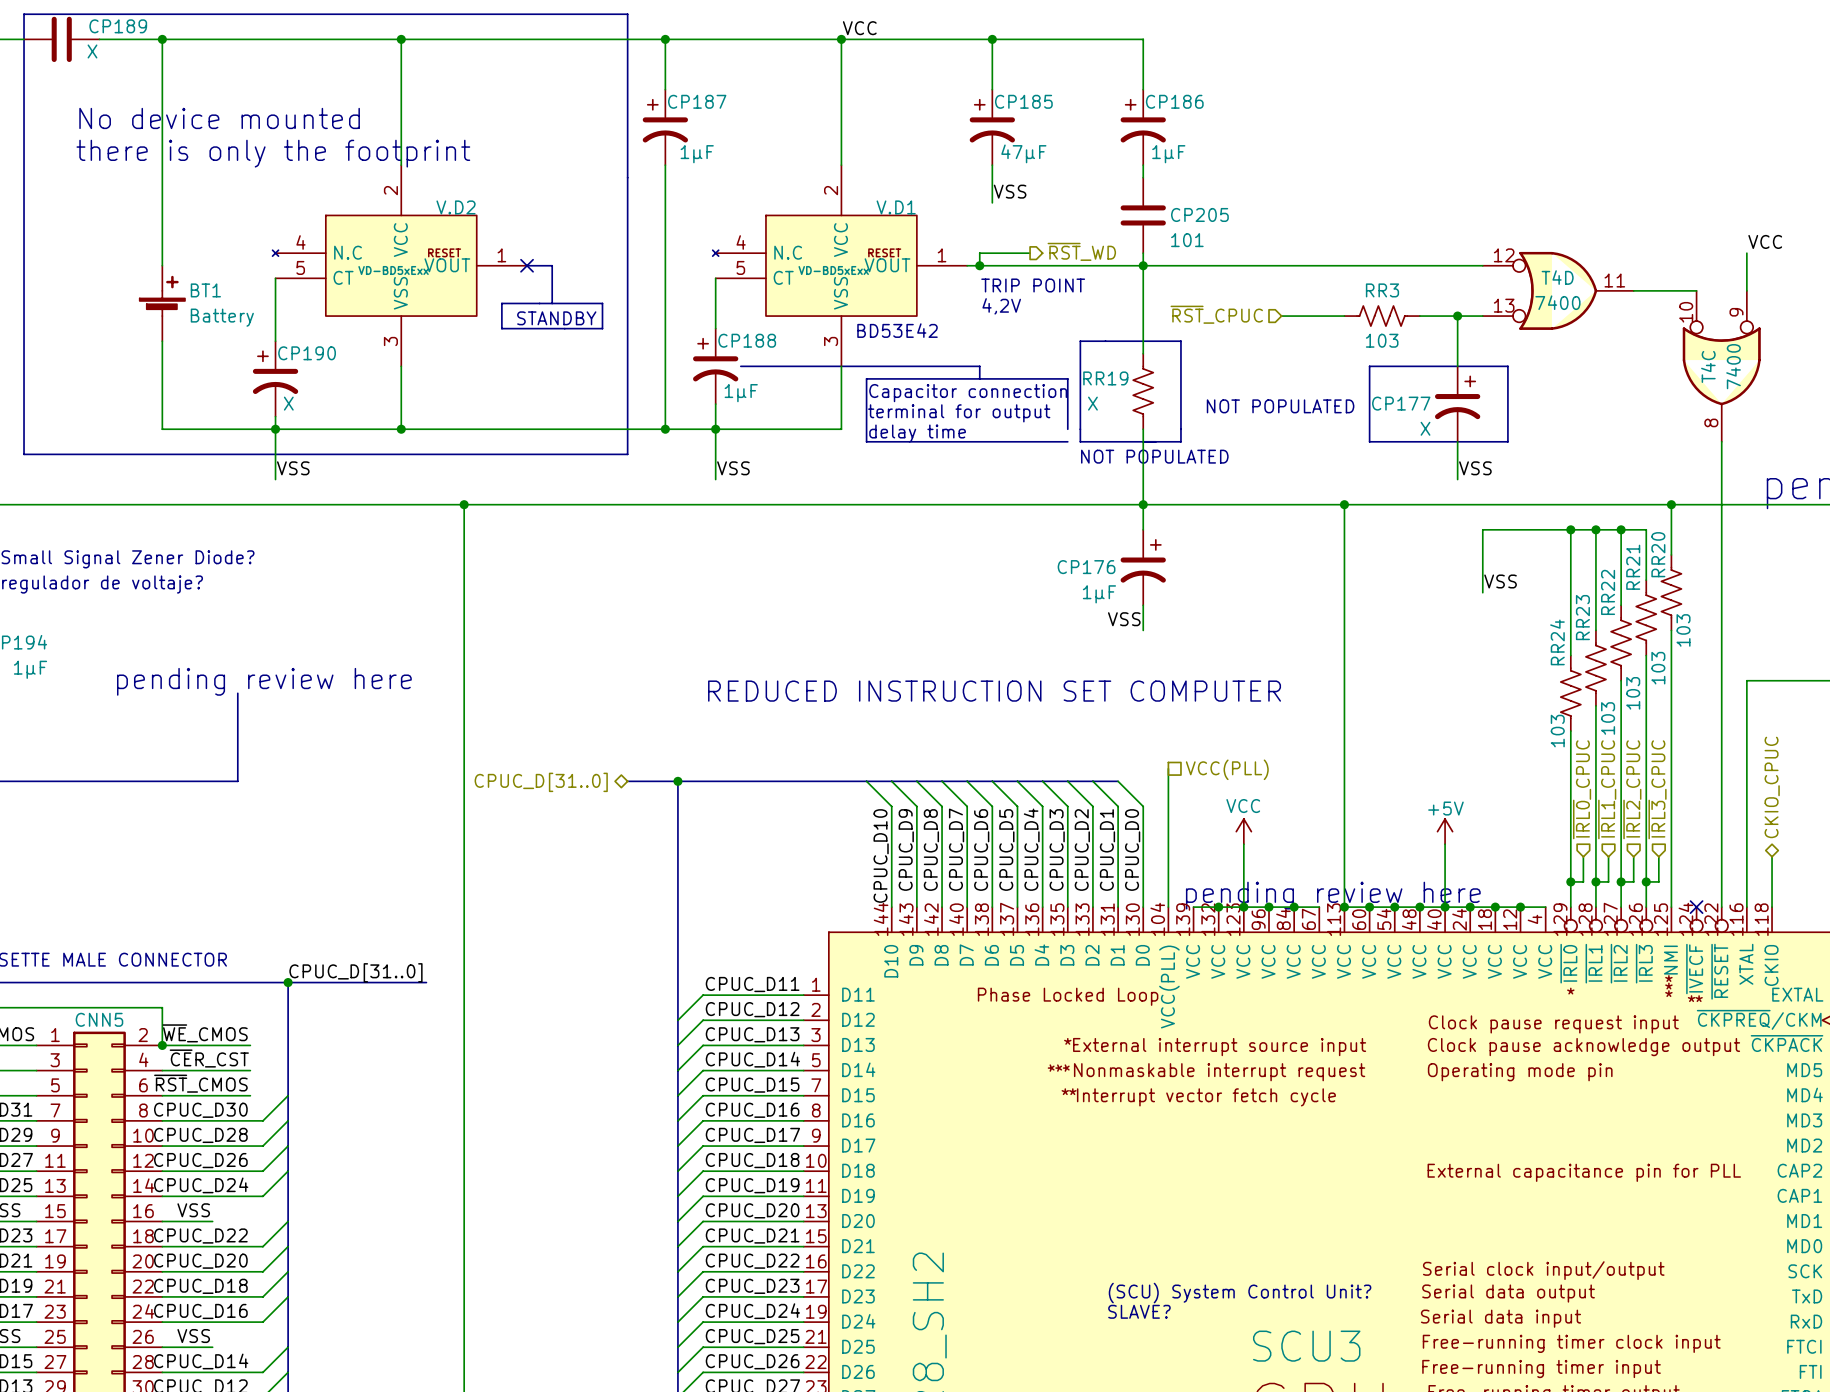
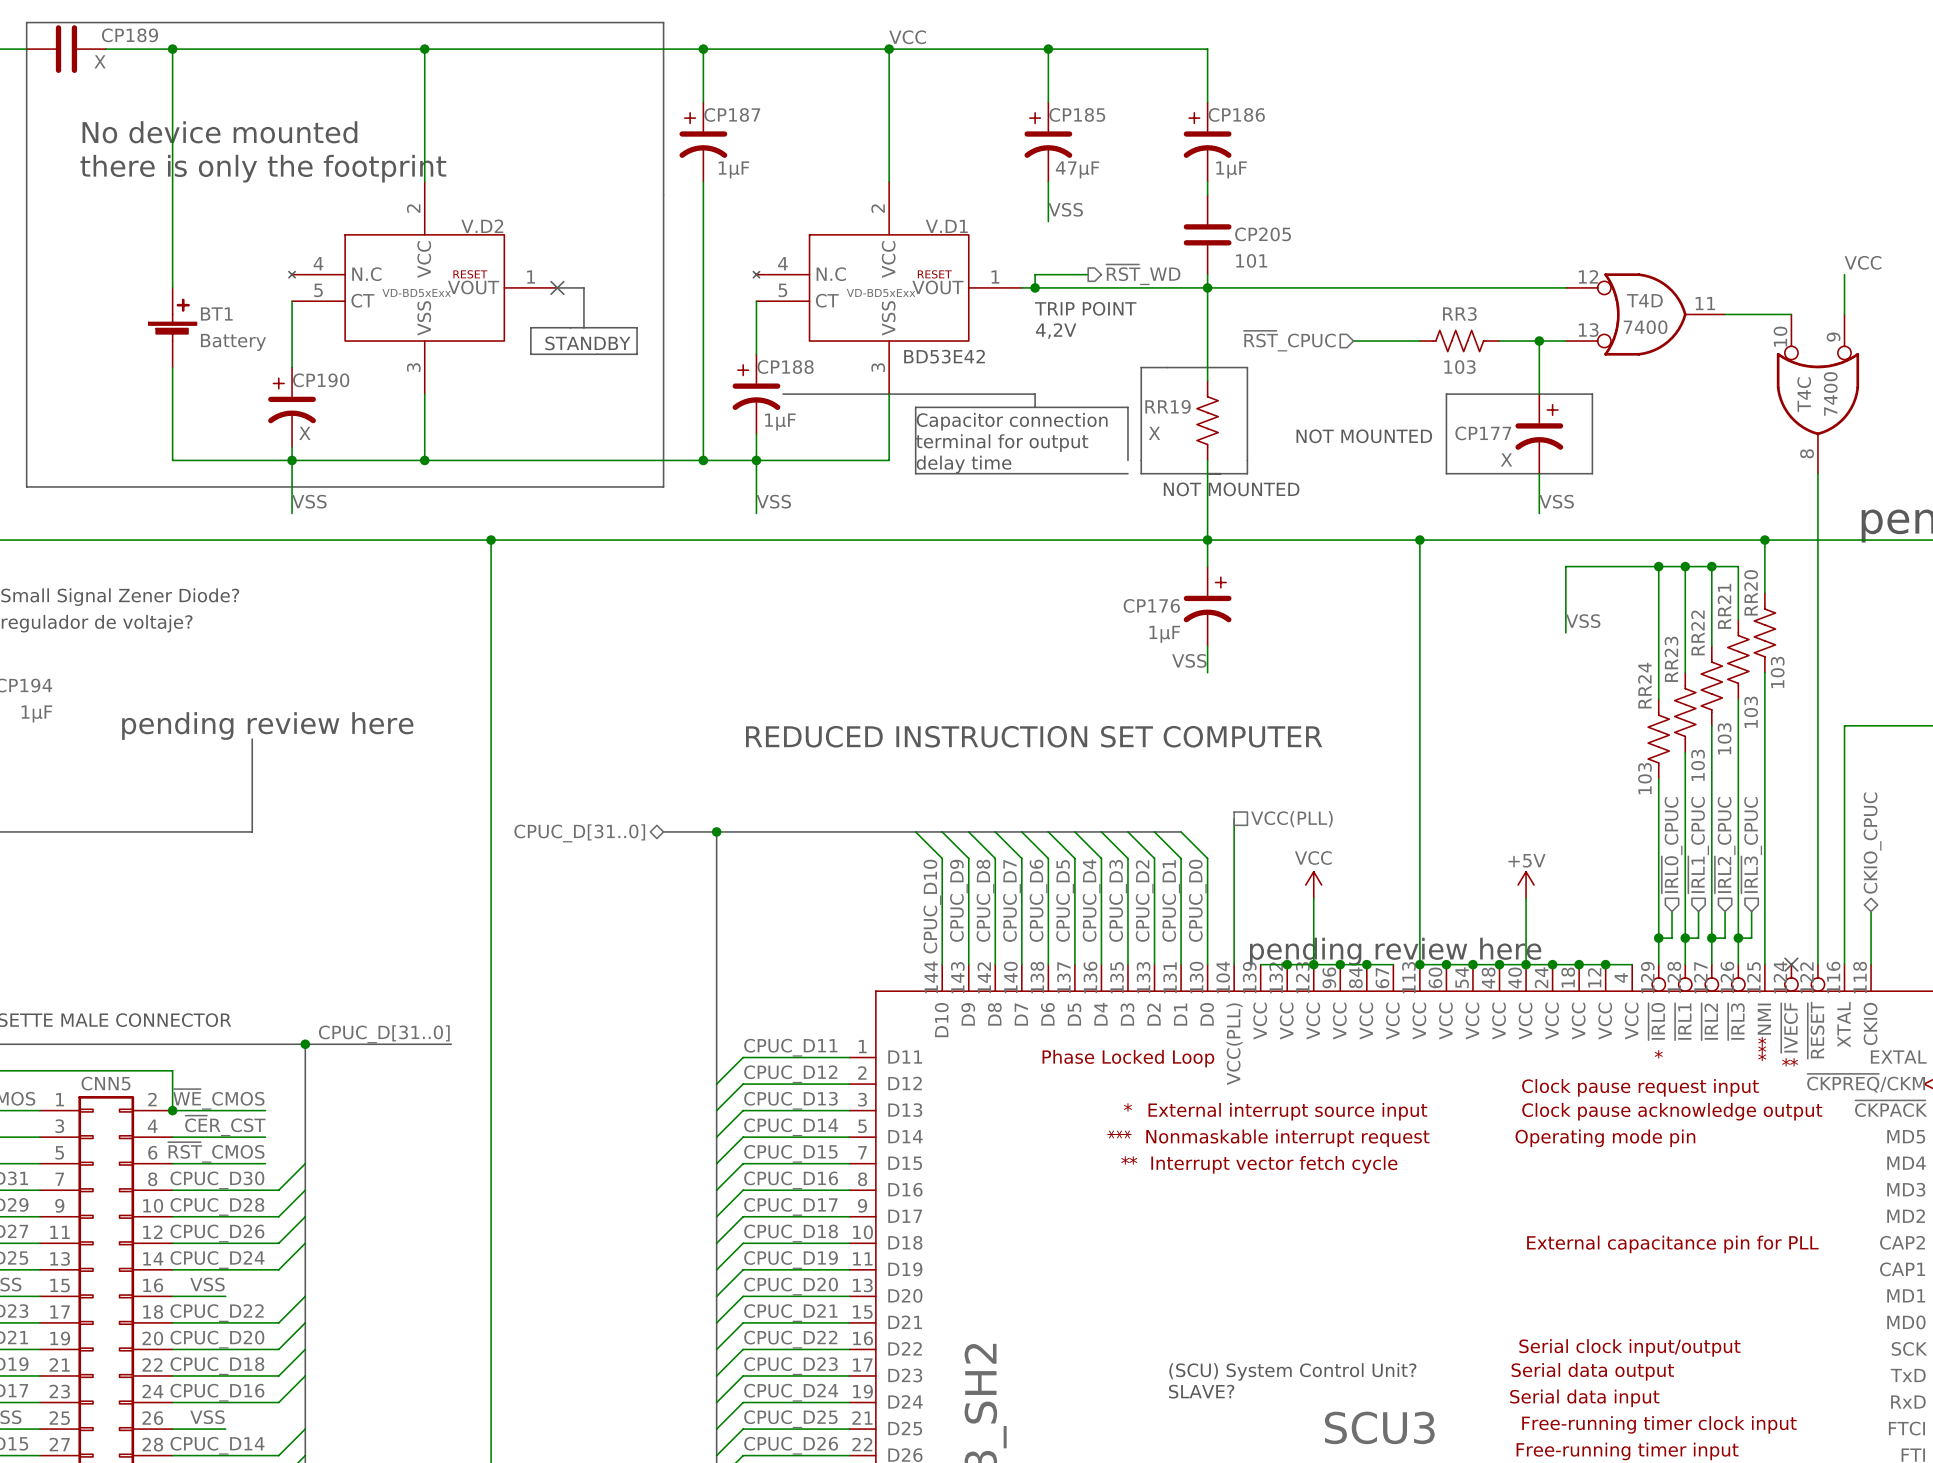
text: NOT POPULATED (1280, 406) -> NOT MOUNTED (1364, 436)
text: NOT POPULATED (1154, 456) -> NOT MOUNTED (1231, 489)

